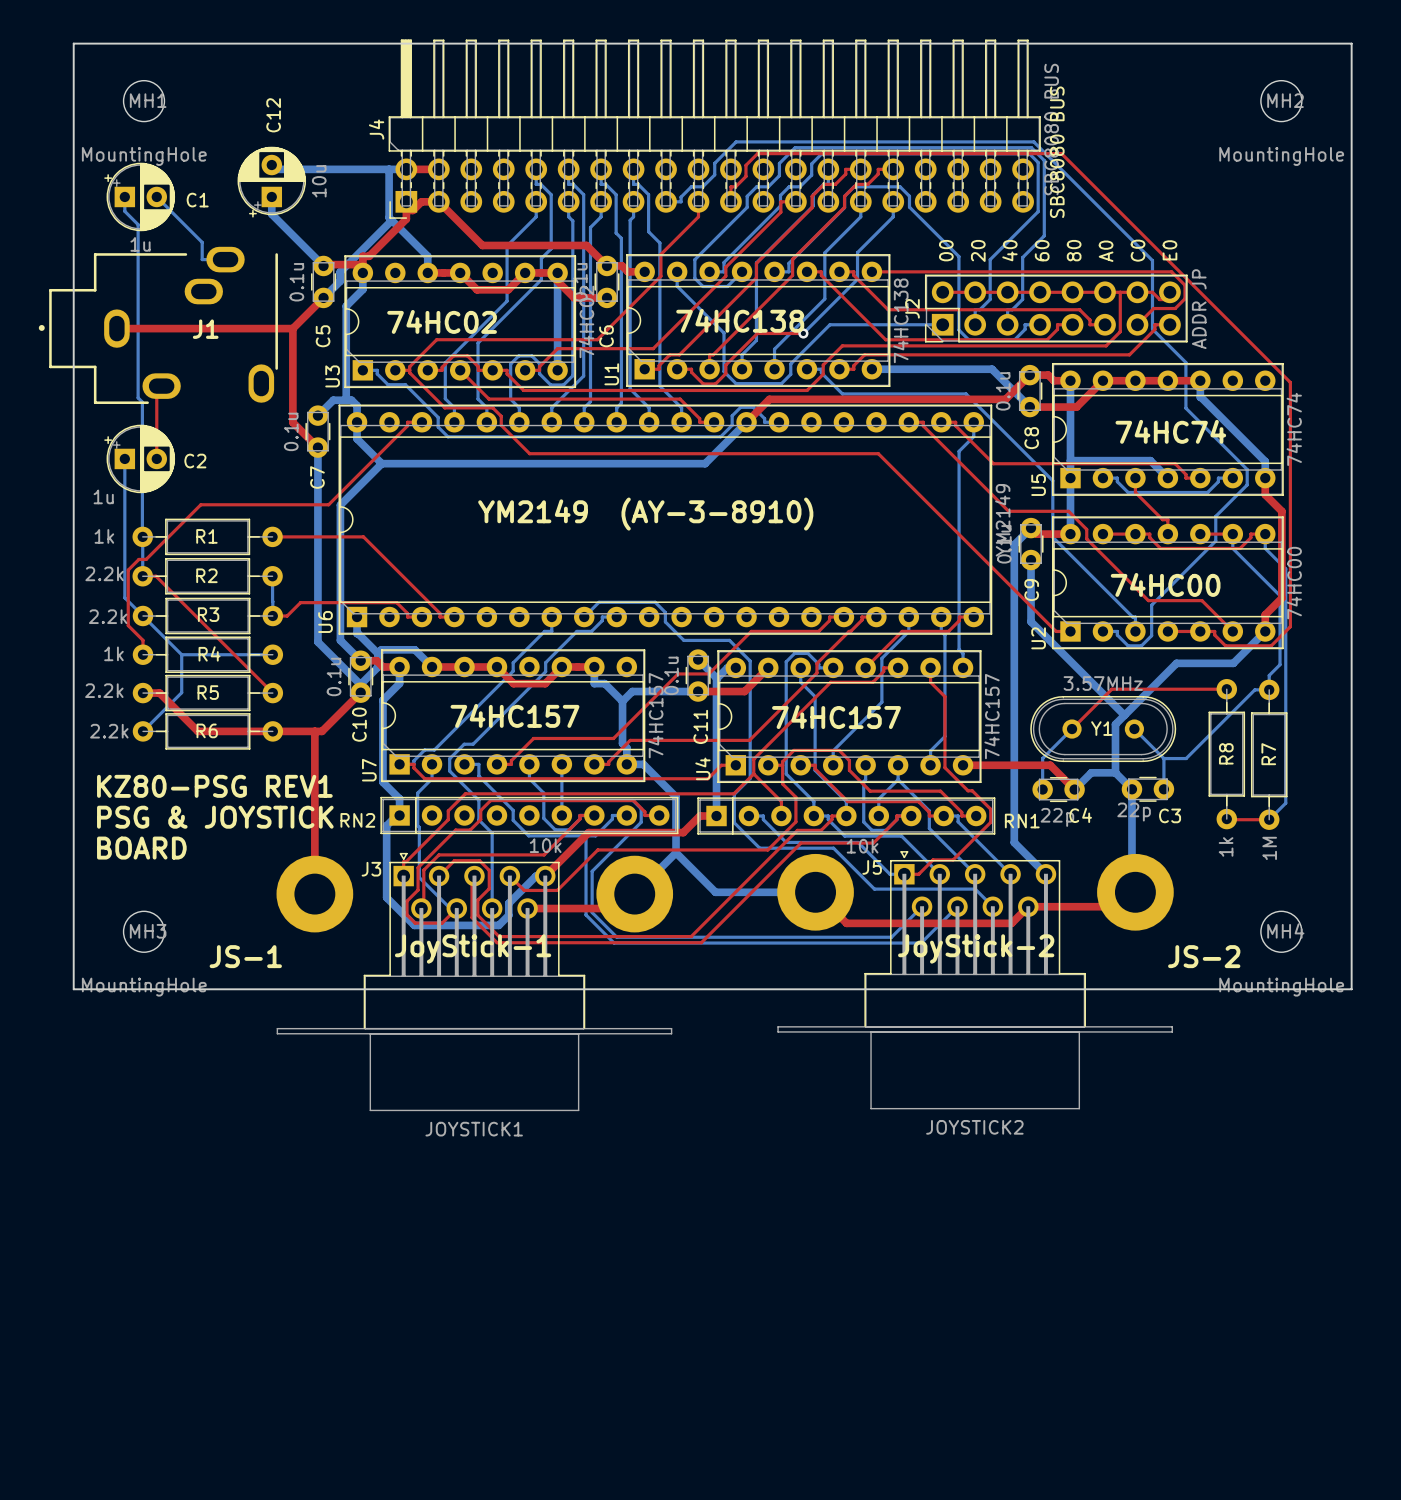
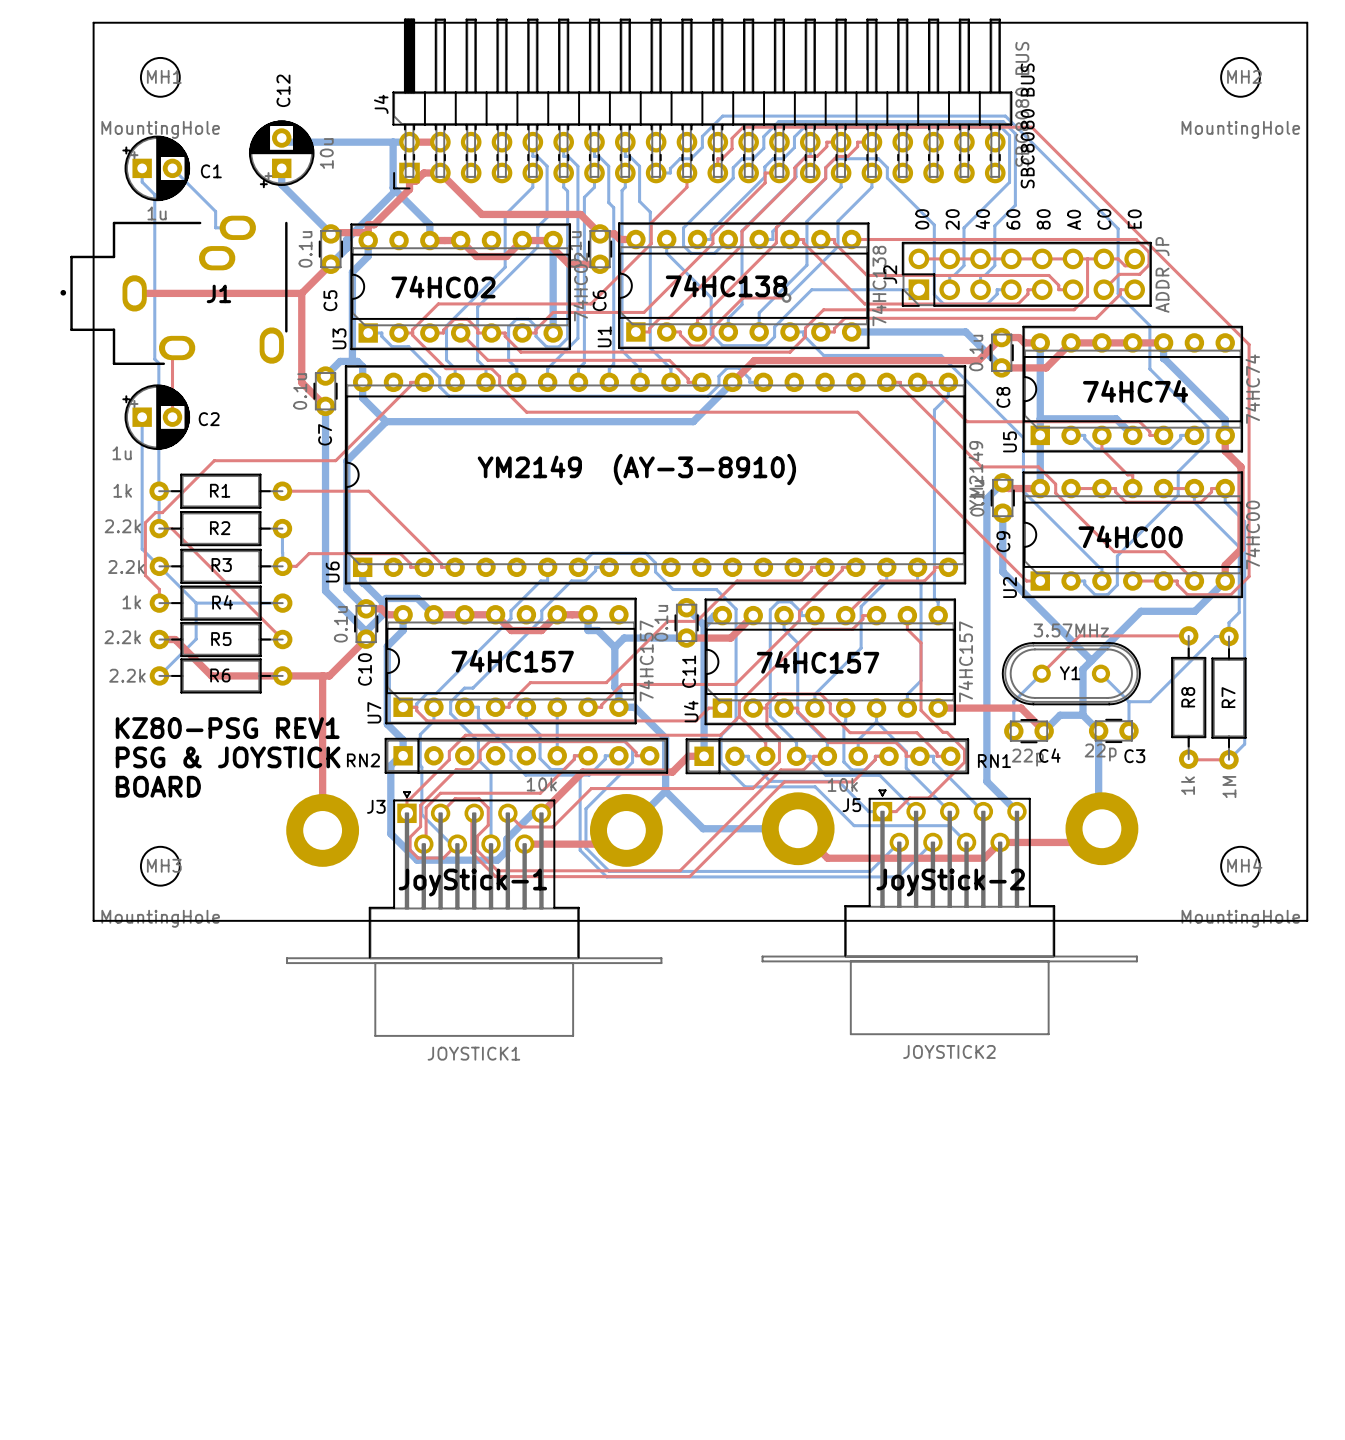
text: JS-1 (245, 956) -> none
text: JS-2 (1204, 956) -> none

